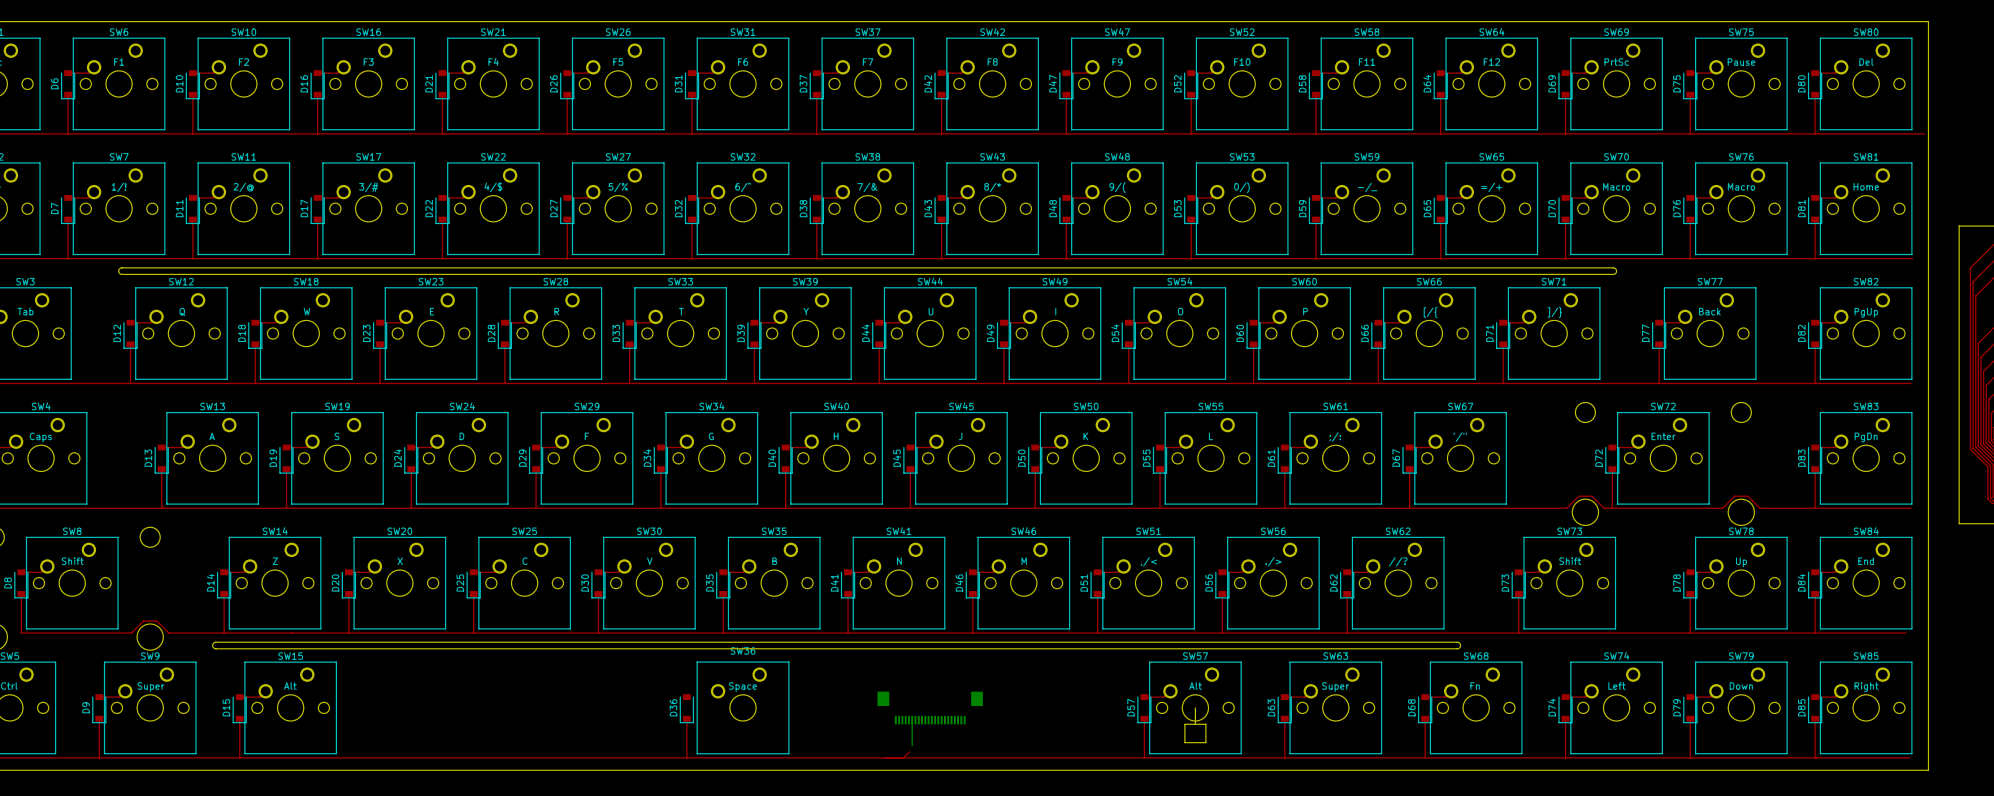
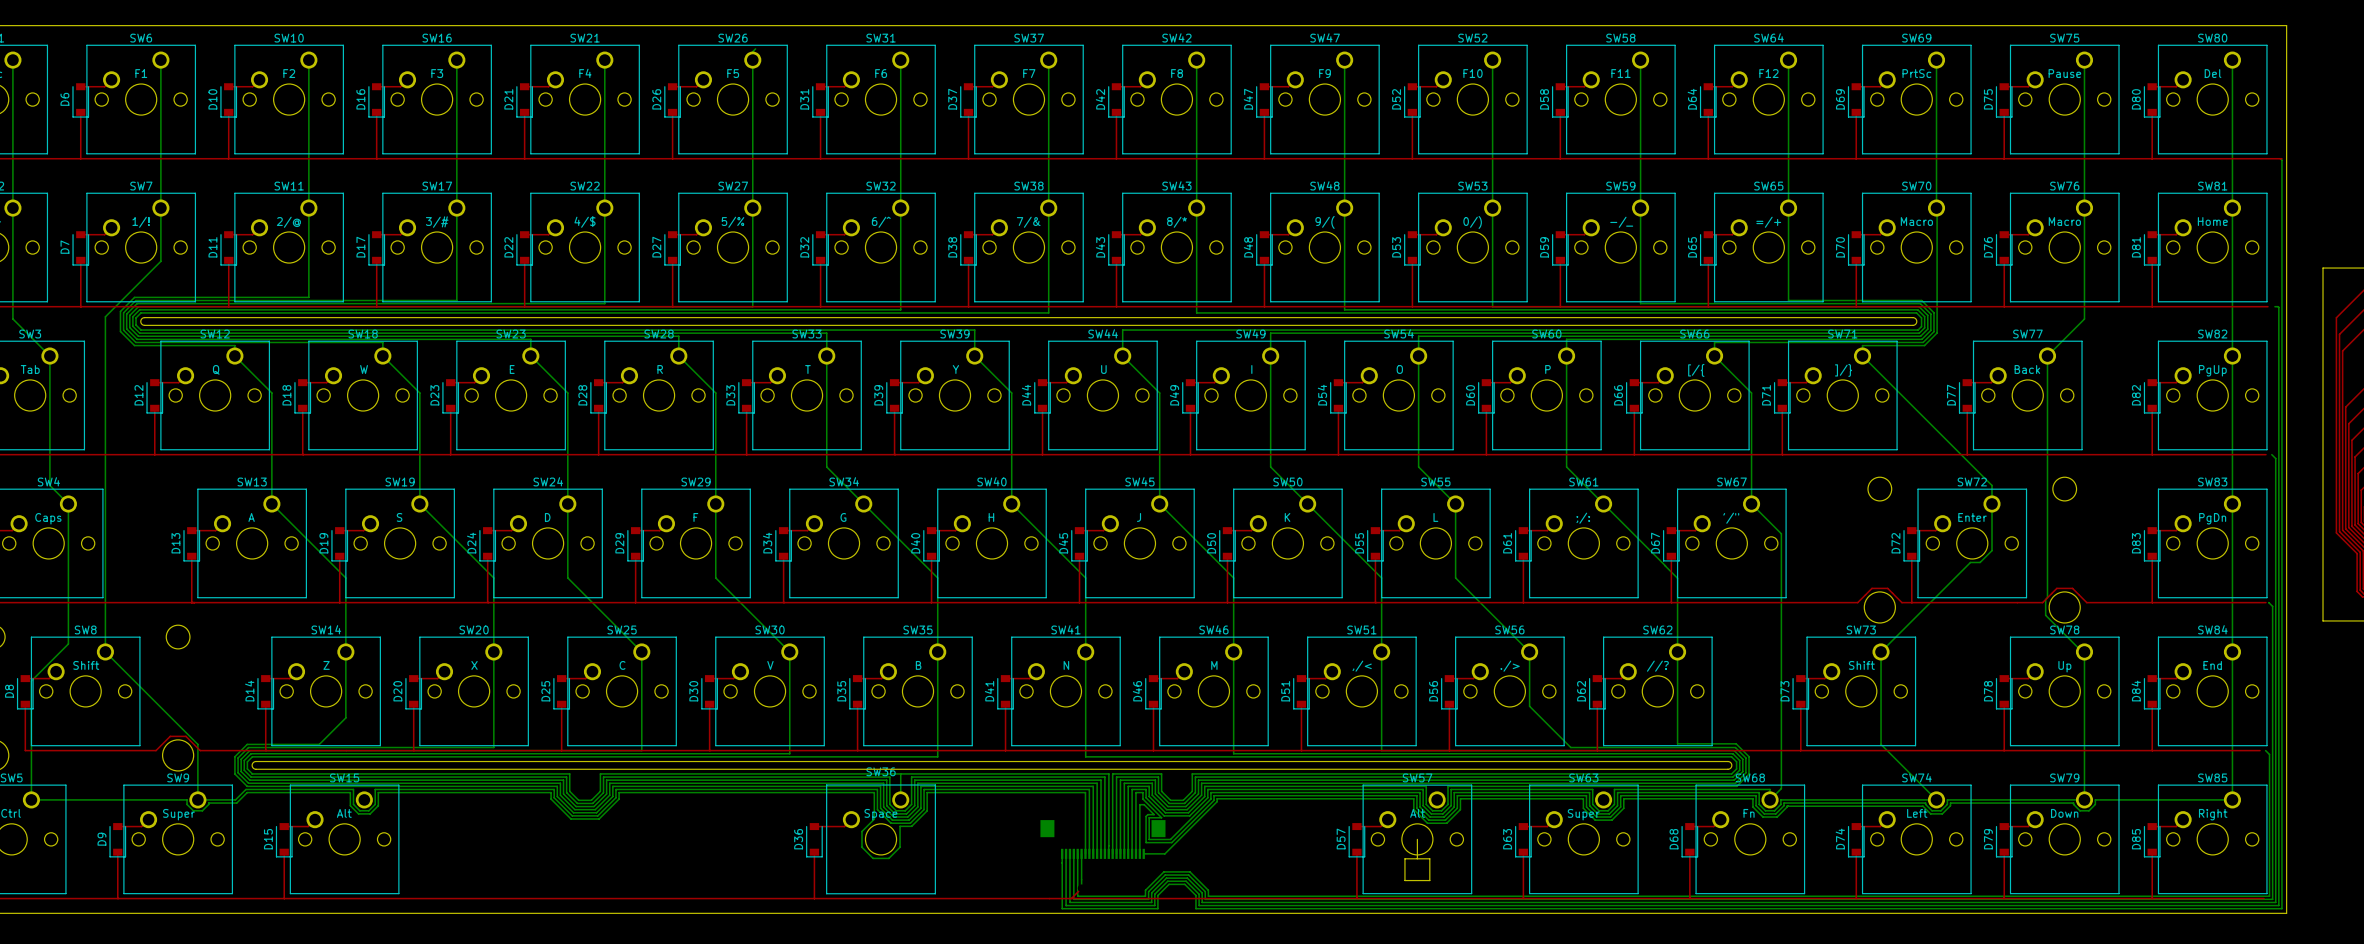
bottom track: none -> (755, 48) (752, 51) (752, 306) (138, 306) (129, 315) (129, 327) (138, 336) (678, 336) (678, 356) (715, 393) (715, 577) (789, 651) (789, 753) (251, 753) (244, 760) (244, 770) (251, 777) (566, 777) (566, 792) (577, 803) (592, 803) (603, 792) (603, 777) (889, 777) (889, 804) (896, 810) (905, 810) (911, 804) (911, 777) (1104, 777) (1104, 853)
bottom track: none -> (12, 60) (12, 319) (49, 356) (49, 485) (68, 503) (68, 643) (31, 680) (31, 799) (187, 799) (187, 804) (193, 810) (202, 810) (208, 803) (236, 803) (247, 792) (350, 792) (350, 805) (358, 813) (370, 813) (378, 805) (378, 792) (551, 792) (551, 799) (571, 818) (599, 818) (619, 799) (619, 792) (874, 792) (874, 819) (861, 831) (861, 847) (873, 858) (888, 858) (900, 847) (900, 826) (911, 826) (927, 810) (927, 792) (1085, 792) (1085, 853)
bottom track: none -> (160, 60) (160, 261) (105, 316) (105, 651) (197, 744) (197, 799) (235, 799) (245, 789) (353, 789) (353, 804) (359, 810) (368, 810) (375, 804) (375, 789) (554, 789) (554, 797) (572, 815) (597, 815) (615, 797) (615, 789) (877, 789) (877, 809) (891, 823) (910, 823) (924, 809) (924, 789) (1089, 789) (1089, 853)
bottom track: none -> (308, 60) (308, 297) (134, 297) (120, 311) (120, 331) (134, 345) (234, 345) (234, 356) (271, 393) (271, 503) (345, 577) (345, 717) (319, 744) (247, 744) (234, 756) (234, 774) (247, 786) (557, 786) (557, 796) (573, 812) (596, 812) (612, 796) (612, 786) (880, 786) (880, 808) (892, 820) (909, 820) (920, 808) (920, 786) (1093, 786) (1093, 853)
bottom track: none -> (456, 60) (456, 300) (135, 300) (123, 312) (123, 330) (135, 342) (382, 342) (382, 356) (419, 393) (419, 503) (493, 577) (493, 747) (248, 747) (238, 757) (238, 772) (248, 783) (560, 783) (560, 795) (574, 809) (595, 809) (609, 795) (609, 783) (883, 783) (883, 807) (893, 817) (907, 817) (917, 807) (917, 783) (1097, 783) (1097, 853)
bottom track: none -> (604, 60) (604, 303) (137, 303) (126, 314) (126, 328) (137, 339) (530, 339) (530, 356) (567, 393) (567, 577) (641, 651) (641, 750) (249, 750) (241, 759) (241, 771) (249, 780) (563, 780) (563, 793) (576, 806) (594, 806) (606, 793) (606, 780) (886, 780) (886, 805) (894, 813) (906, 813) (914, 805) (914, 780) (1101, 780) (1101, 853)
bottom track: none -> (900, 60) (900, 309) (139, 309) (132, 316) (132, 326) (139, 333) (826, 333) (826, 467) (937, 577) (937, 756) (252, 756) (247, 761) (247, 768) (252, 773) (569, 773) (569, 791) (578, 800) (591, 800) (600, 791) (600, 773) (1108, 773) (1108, 853)
bottom track: none -> (1048, 60) (1048, 312) (141, 312) (136, 317) (136, 325) (141, 330) (974, 330) (974, 356) (1011, 393) (1011, 503) (1085, 577) (1085, 756) (1731, 756) (1736, 761) (1736, 769) (1731, 773) (1192, 773) (1192, 791) (1183, 800) (1170, 800) (1161, 791) (1161, 773) (1112, 773) (1112, 853)
bottom track: none -> (1196, 60) (1196, 312) (1916, 312) (1921, 317) (1921, 326) (1918, 330) (1122, 330) (1122, 356) (1159, 393) (1159, 503) (1233, 577) (1233, 753) (1732, 753) (1739, 760) (1739, 770) (1732, 777) (1195, 777) (1195, 792) (1184, 803) (1169, 803) (1158, 792) (1158, 777) (1116, 777) (1116, 853)
bottom track: none -> (1344, 60) (1344, 309) (1917, 309) (1924, 316) (1924, 327) (1919, 333) (1270, 333) (1270, 467) (1381, 577) (1381, 750) (1734, 750) (1742, 759) (1742, 771) (1734, 780) (1198, 780) (1198, 793) (1185, 806) (1168, 806) (1155, 793) (1155, 780) (1120, 780) (1120, 853)
bottom track: none -> (1492, 60) (1492, 306) (1919, 306) (1927, 315) (1927, 329) (1920, 336) (1418, 336) (1418, 467) (1455, 503) (1455, 577) (1529, 651) (1529, 706) (1570, 747) (1735, 747) (1745, 757) (1745, 772) (1735, 783) (1201, 783) (1201, 795) (1187, 809) (1166, 809) (1152, 795) (1152, 783) (1124, 783) (1124, 853)
bottom track: none -> (1640, 60) (1640, 303) (1920, 303) (1930, 314) (1930, 330) (1921, 339) (1566, 339) (1566, 467) (1677, 578) (1677, 743) (1736, 743) (1749, 756) (1749, 774) (1736, 786) (1447, 786) (1447, 804) (1441, 810) (1432, 810) (1426, 804) (1426, 786) (1204, 786) (1204, 796) (1188, 812) (1165, 812) (1149, 796) (1149, 786) (1128, 786) (1128, 853)
bottom track: none -> (1788, 60) (1788, 300) (1921, 300) (1933, 312) (1933, 331) (1923, 342) (1714, 342) (1714, 356) (1751, 393) (1751, 503) (1781, 533) (1781, 788) (1770, 799) (1770, 789) (1614, 789) (1614, 804) (1608, 810) (1599, 810) (1592, 804) (1592, 789) (1451, 789) (1451, 805) (1442, 813) (1431, 813) (1423, 805) (1423, 789)
bottom track: none -> (1936, 60) (1937, 332) (1924, 345) (1862, 345) (1862, 356) (1992, 485) (1992, 550) (1980, 562) (1970, 562) (1881, 651) (1881, 744) (1936, 799) (1780, 799) (1780, 804) (1774, 810) (1765, 810) (1759, 804) (1759, 792) (1617, 792) (1617, 805) (1609, 813) (1597, 813) (1589, 805) (1589, 792) (1454, 792) (1454, 807) (1444, 817) (1430, 817) (1420, 807) (1420, 792) (1210, 792) (1210, 799) (1170, 839) (1149, 839) (1149, 817) (1161, 817) (1142, 799) (1142, 792) (1136, 792)
bottom track: none -> (2084, 60) (2084, 319) (2047, 356) (2047, 597) (2045, 599) (2045, 615) (2084, 651) (2084, 799) (1947, 799) (1947, 804) (1941, 810) (1932, 810) (1925, 803) (1784, 803) (1784, 805) (1775, 813) (1764, 813) (1756, 805) (1756, 795) (1620, 795) (1620, 807) (1610, 817) (1596, 817) (1586, 807) (1586, 795) (1457, 795) (1457, 808) (1445, 820) (1428, 820) (1416, 808) (1416, 795) (1214, 795) (1214, 800) (1171, 842) (1146, 842) (1146, 816) (1154, 814) (1144, 804) (1139, 804) (1139, 853)
bottom track: none -> (2232, 60) (2232, 799) (2095, 799) (2095, 804) (2088, 810) (2079, 810) (2073, 803) (1950, 803) (1950, 805) (1942, 813) (1930, 813) (1923, 806) (1787, 806)
bottom track: none -> (2280, 158) (2281, 160) (2281, 908) (1195, 908) (1195, 895) (1184, 884) (1169, 884) (1157, 895) (1157, 908) (1062, 908) (1062, 862)
bottom track: none -> (2274, 306) (2278, 307) (2278, 905) (1199, 905) (1199, 894) (1186, 881) (1167, 881) (1154, 894) (1154, 905) (1066, 905)
bottom track: none -> (2271, 454) (2275, 458) (2275, 902) (1202, 902) (1202, 892) (1187, 878) (1166, 878) (1151, 892) (1151, 902) (1069, 902) (1069, 853)
bottom track: none -> (2268, 602) (2272, 606) (2272, 899) (1205, 899) (1205, 891) (1188, 875) (1165, 875) (1148, 891) (1148, 899) (1073, 899) (1073, 853)
bottom track: none -> (2265, 750) (2269, 754) (2269, 896) (1208, 896) (1208, 890) (1189, 871) (1163, 871) (1145, 890) (1145, 896) (1077, 896) (1077, 853)
bottom track: none -> (900, 773) (900, 799)
bottom track: none -> (1423, 789) (1207, 789) (1207, 797) (1189, 815) (1164, 815) (1146, 797) (1146, 789) (1132, 789) (1132, 853)
bottom track: none -> (1135, 792) (1135, 853)
bottom track: none -> (1787, 806) (1777, 817) (1762, 817) (1752, 807) (1752, 798) (1623, 798) (1623, 808) (1611, 820) (1595, 820) (1583, 808) (1583, 798) (1460, 798) (1460, 809) (1446, 823) (1427, 823) (1413, 809) (1413, 798) (1217, 798) (1217, 801) (1164, 853) (1143, 853)
top track: none -> (851, 819) (844, 826) (814, 826)
bottom track: none -> (1062, 853) (1062, 862)
bottom track: none -> (1066, 853) (1066, 905)

